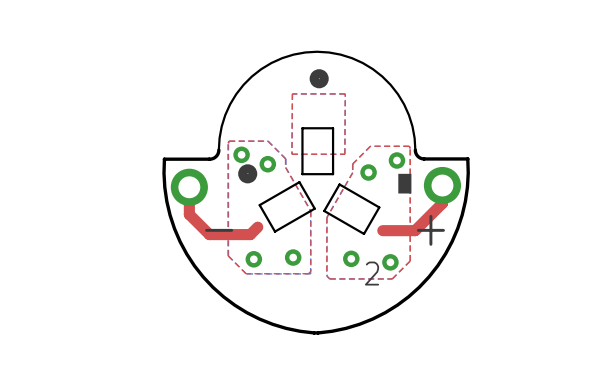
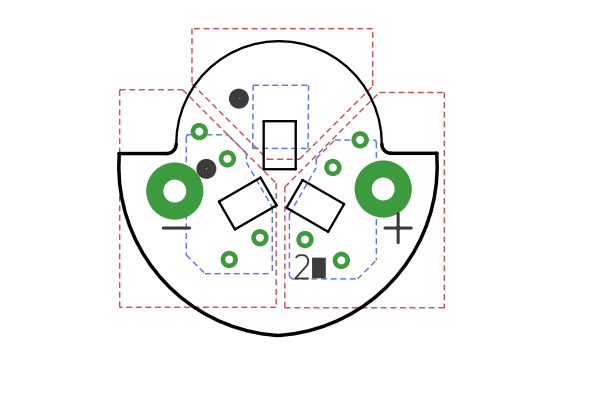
top zone outline: none -> (191, 28) (191, 83) (267, 159) (299, 159) (372, 86) (372, 28) (191, 28)
drawing position: (319, 78) -> (238, 98)
drawing position: (319, 78) -> (238, 98)
drawing position: (319, 78) -> (239, 98)
top zone outline: (292, 93) (291, 154) (344, 154) (345, 93) (292, 93) -> none
top zone outline: none -> (379, 92) (284, 186) (284, 307) (444, 307) (444, 92) (379, 92)
top zone outline: (267, 141) (228, 141) (228, 143) (228, 255) (245, 273) (308, 273) (310, 271) (310, 211) (285, 167) (285, 158) -> (227, 134) (182, 89) (119, 89) (119, 307) (276, 307) (276, 183) (245, 153)
top zone outline: (370, 146) (409, 146) (410, 148) (410, 261) (392, 278) (329, 278) (326, 275) (326, 217) (352, 172) (352, 163) (370, 146) -> none
via position: (241, 154) -> (199, 131)
via position: (396, 160) -> (360, 139)
drawing position: (404, 183) -> (318, 267)
top track: (442, 185) (442, 203) (415, 230) (382, 230) -> none
via: (442, 185) -> none
top track: (189, 187) (189, 214) (209, 234) (250, 234) (257, 227) -> none
via: (189, 187) -> none
via: none -> (383, 189)
via: none -> (174, 191)
via: none -> (259, 237)
via: none -> (304, 239)
via: (293, 257) -> none
via: (351, 258) -> none
via position: (253, 259) -> (229, 259)
via position: (390, 262) -> (341, 260)
text position: 2 (372, 273) -> 2 (301, 266)

